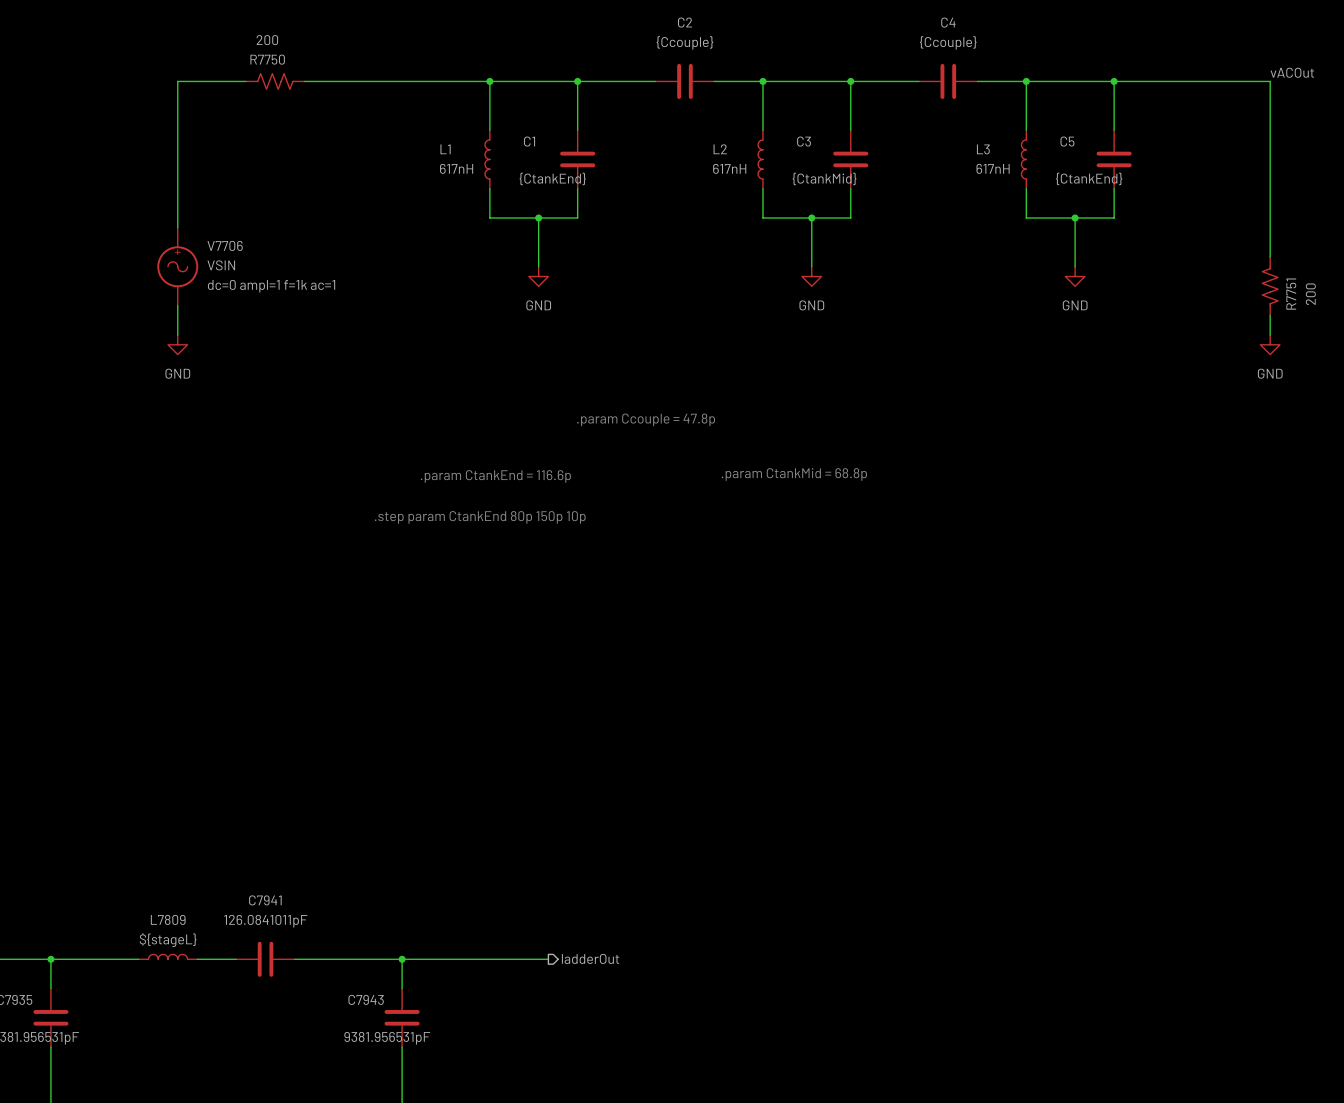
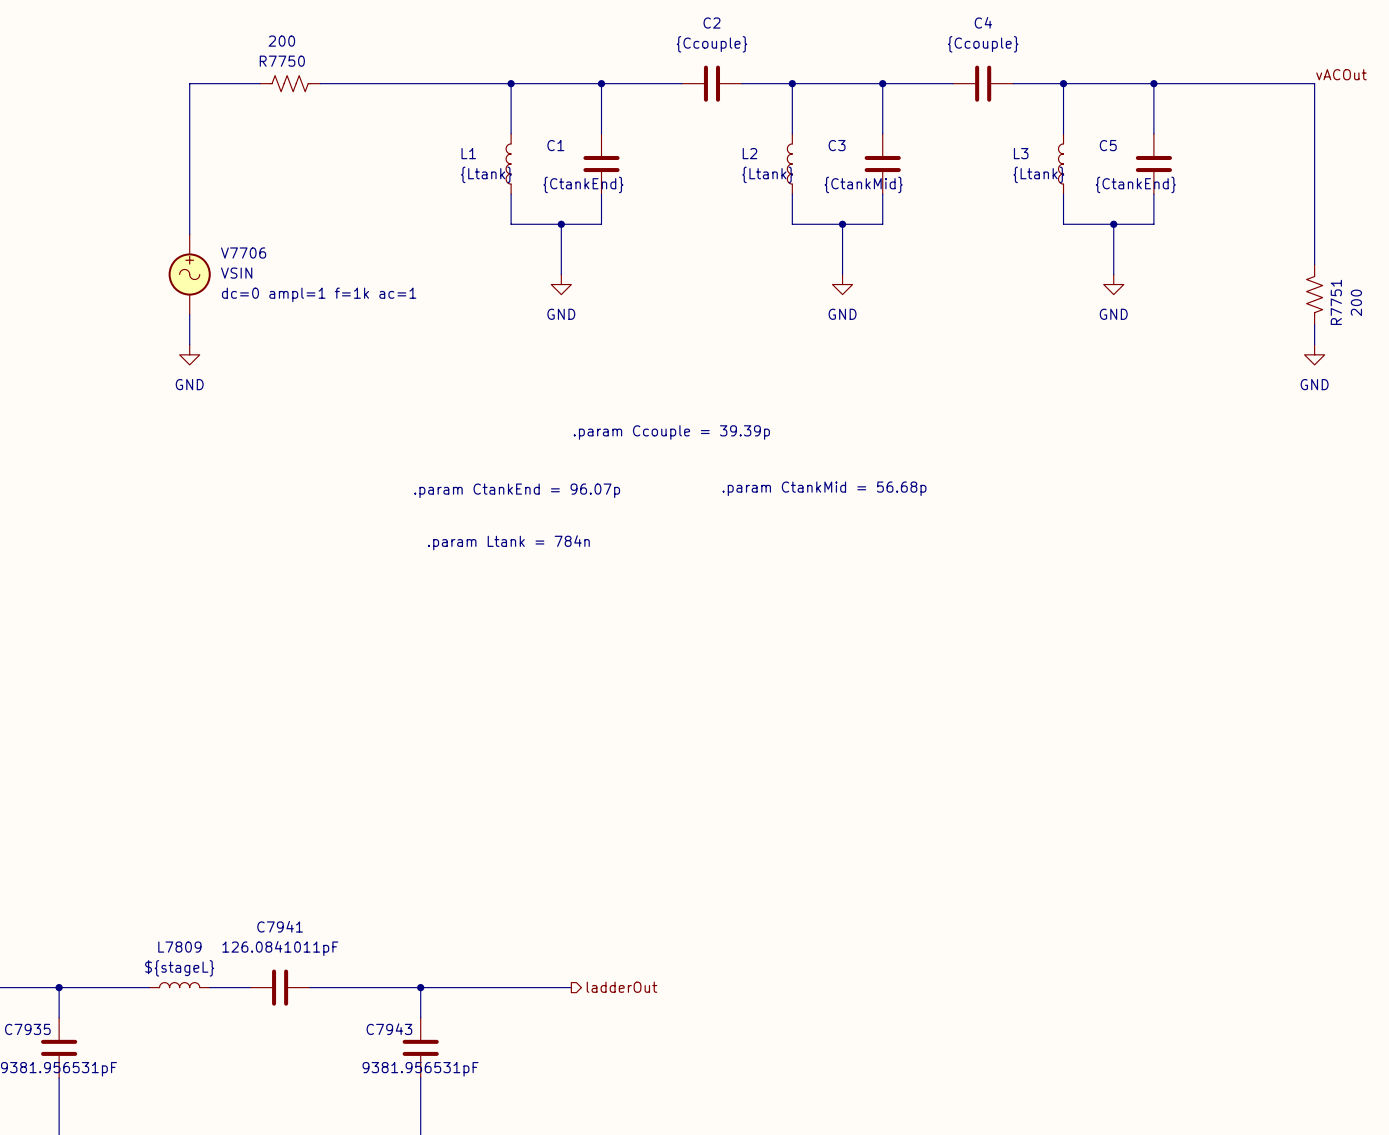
L1 value: 617nH (456, 168) -> {Ltank} (486, 174)
L2 value: 617nH (729, 168) -> {Ltank} (767, 174)
L3 value: 617nH (993, 168) -> {Ltank} (1038, 174)
text: .param Ccouple = 47.8p (646, 419) -> .param Ccouple = 39.39p (671, 432)
text: .param CtankMid = 68.8p (794, 474) -> .param CtankMid = 56.68p (824, 488)
text: .param CtankEnd = 116.6p (495, 476) -> .param CtankEnd = 96.07p (517, 490)
text: .step param CtankEnd 80p 150p 10p (480, 517) -> none
text: none -> .param Ltank = 784n (508, 542)

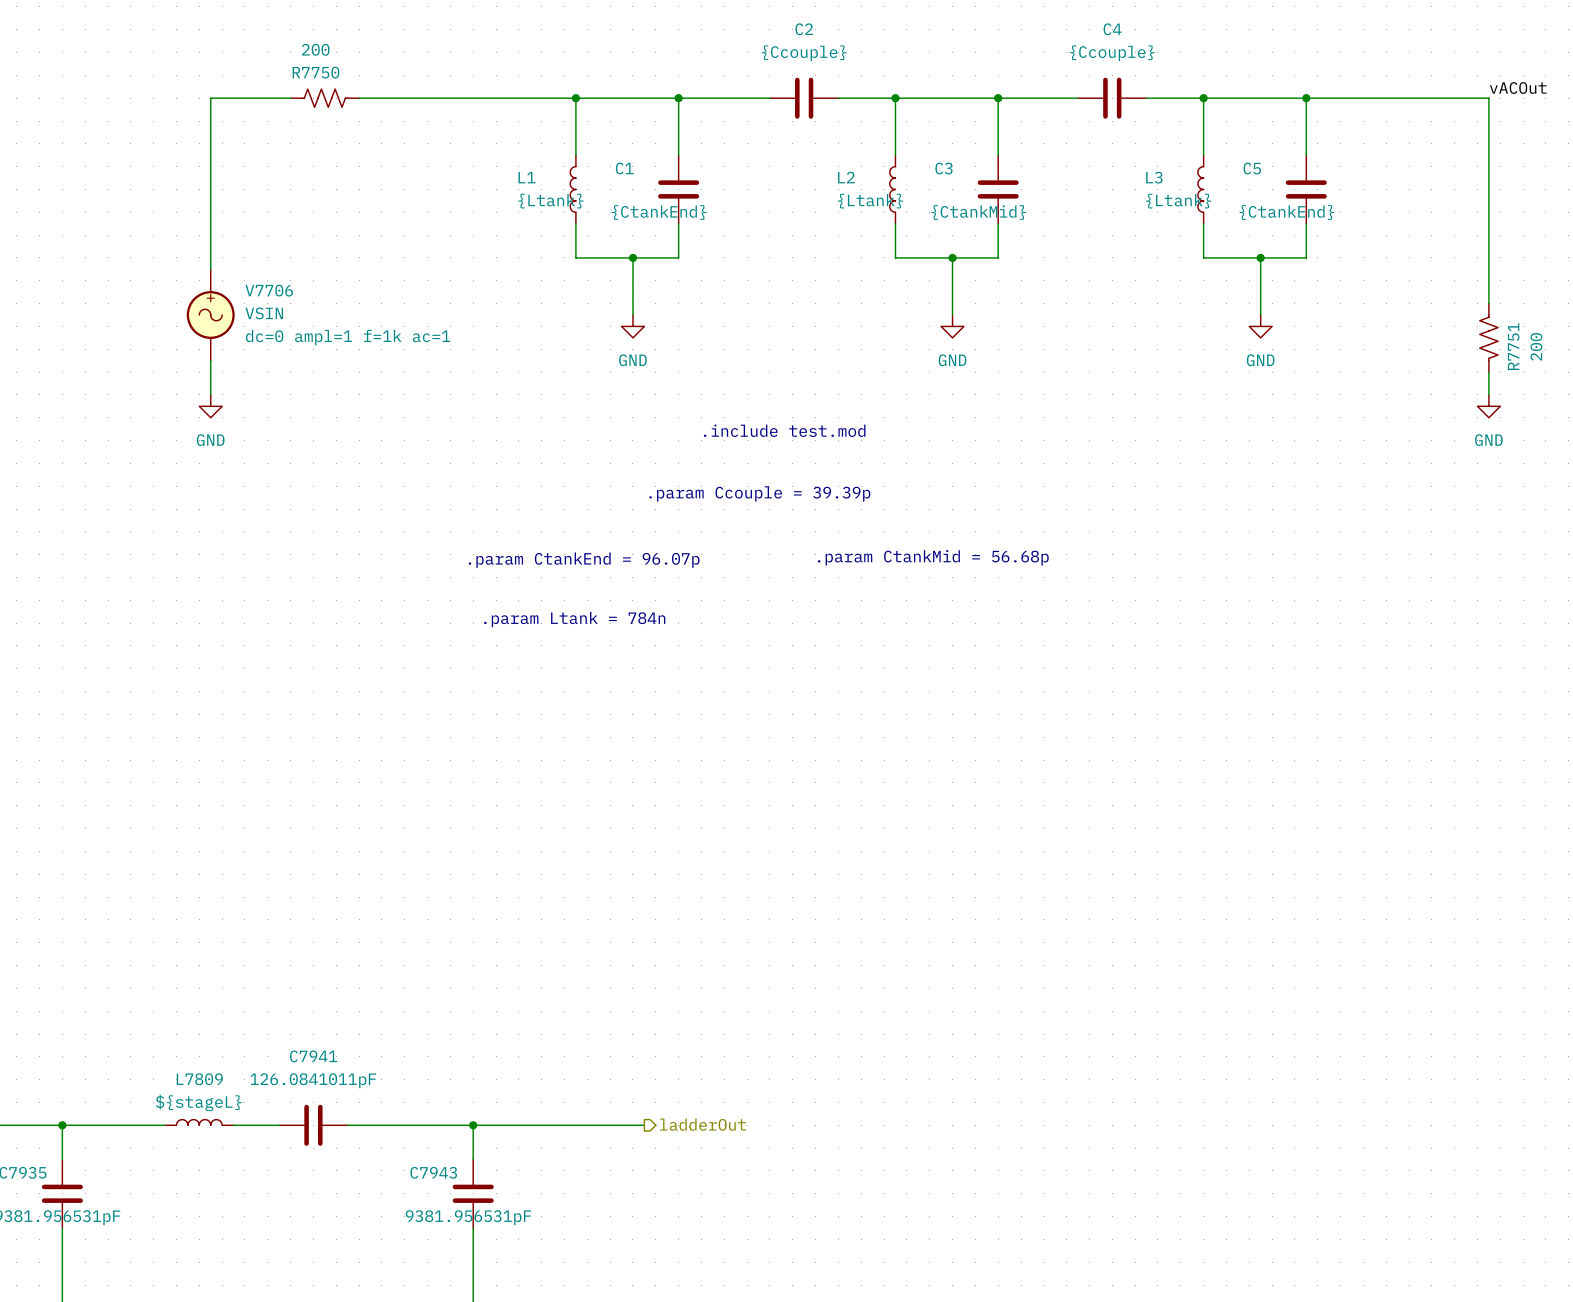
text: none -> .include test.mod (784, 430)

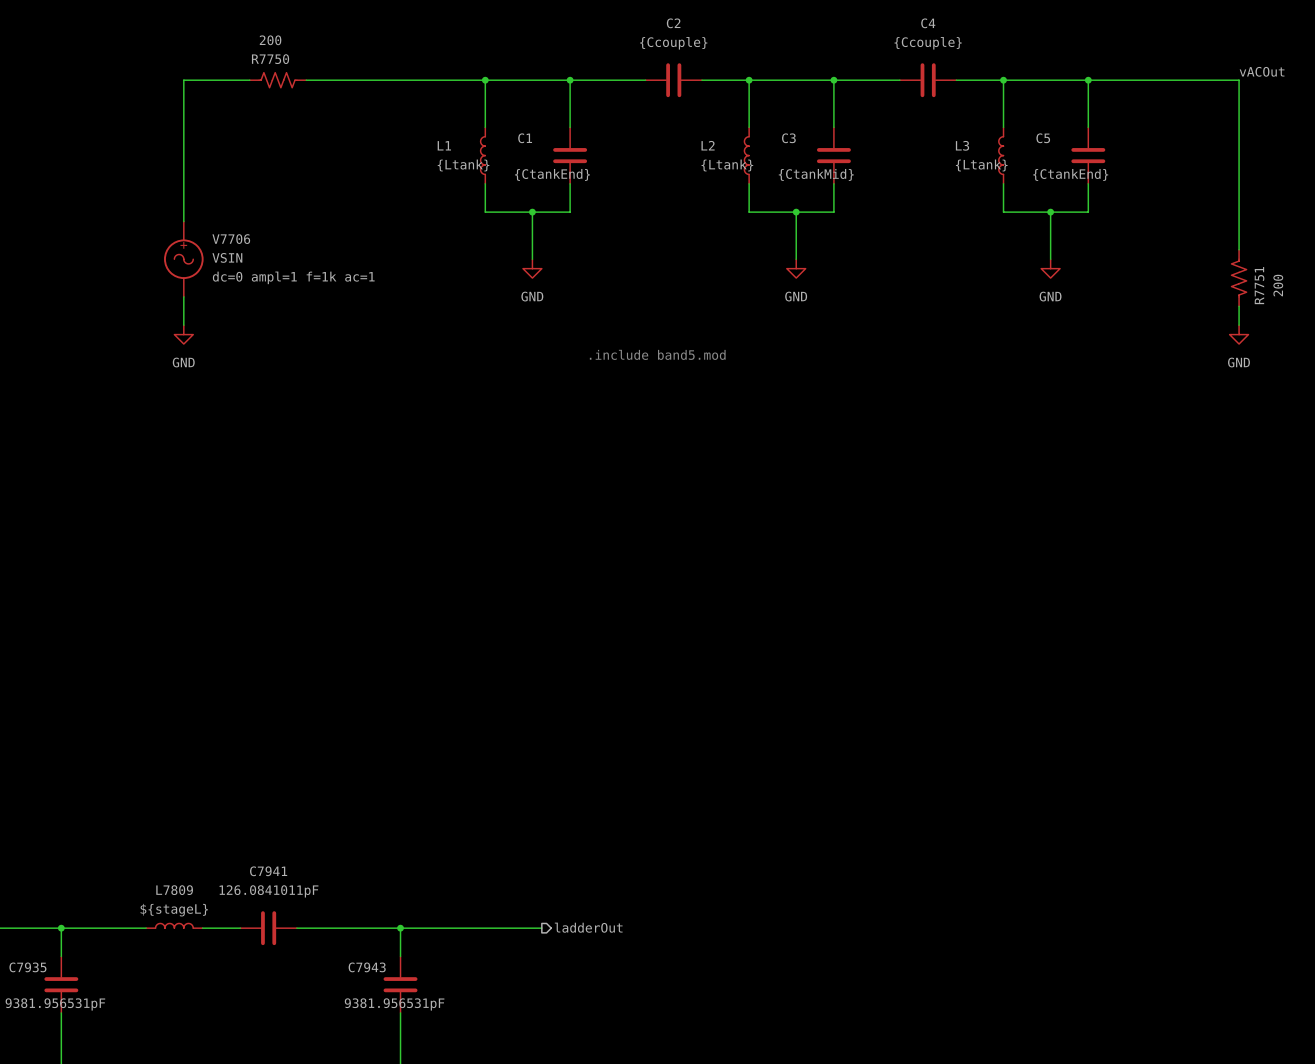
text: .include test.mod (784, 430) -> .include band5.mod (657, 354)
text: .param Ccouple = 39.39p (759, 493) -> none
text: .param CtankMid = 56.68p (933, 557) -> none
text: .param CtankEnd = 96.07p (584, 560) -> none
text: .param Ltank = 784n (574, 619) -> none

